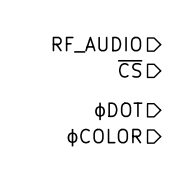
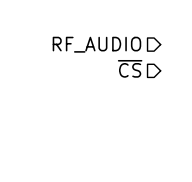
hierarchical label: ϕDOT (118, 111) -> none
hierarchical label: ϕCOLOR (104, 137) -> none

